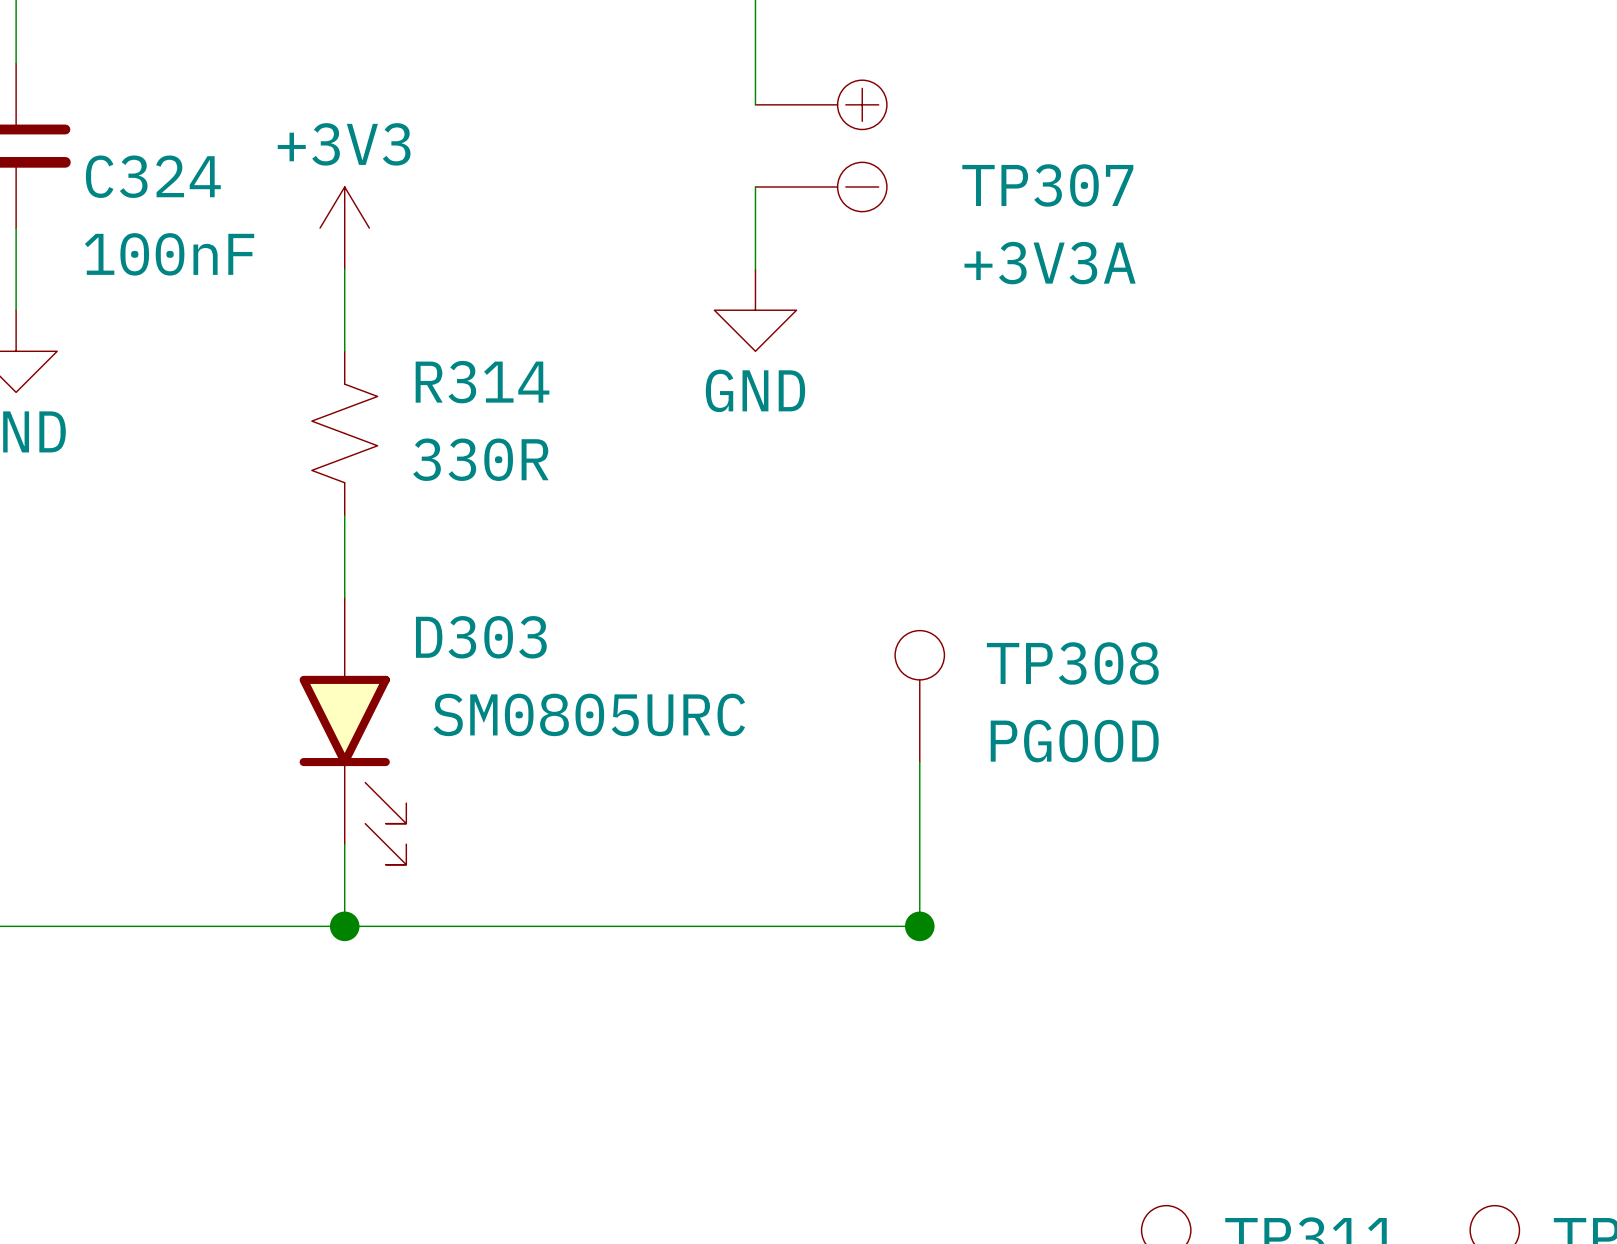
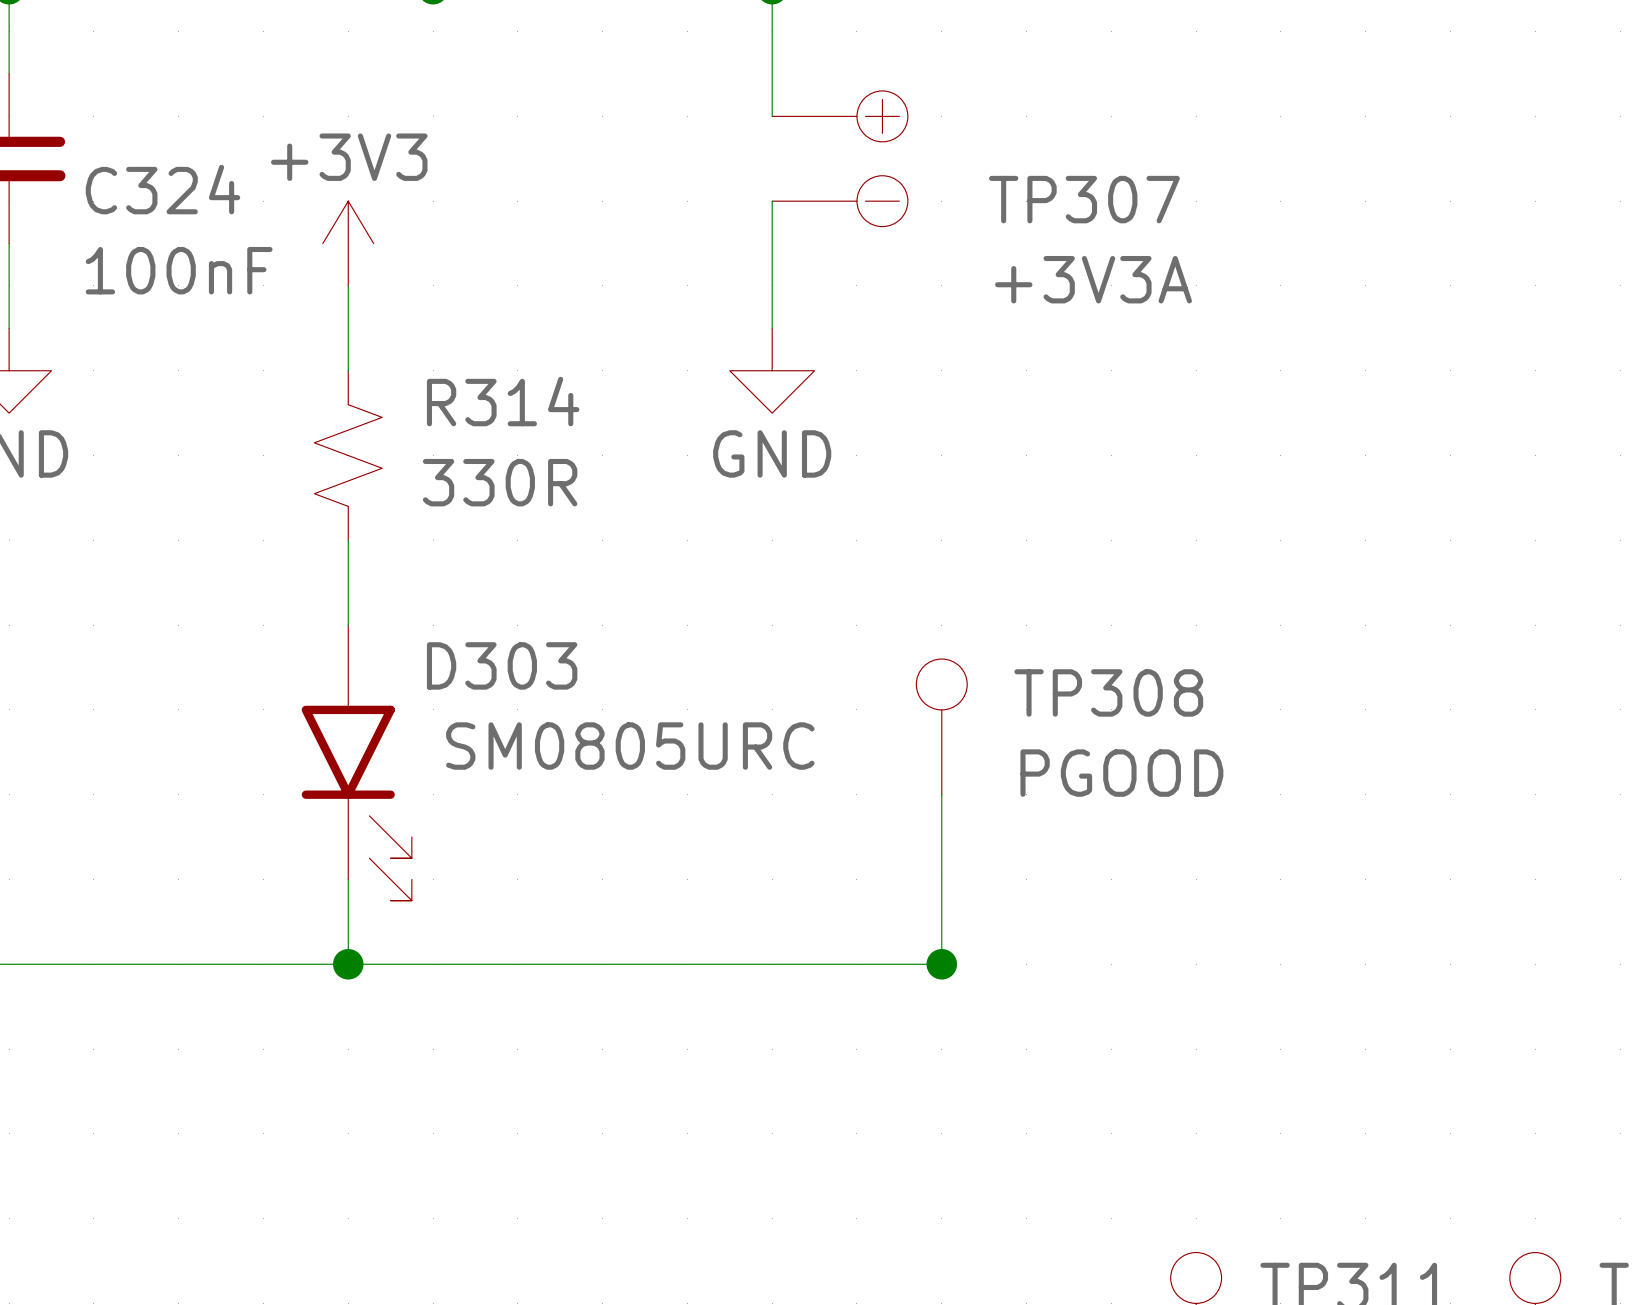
power symbol position: GND (755, 310) -> GND (772, 370)

